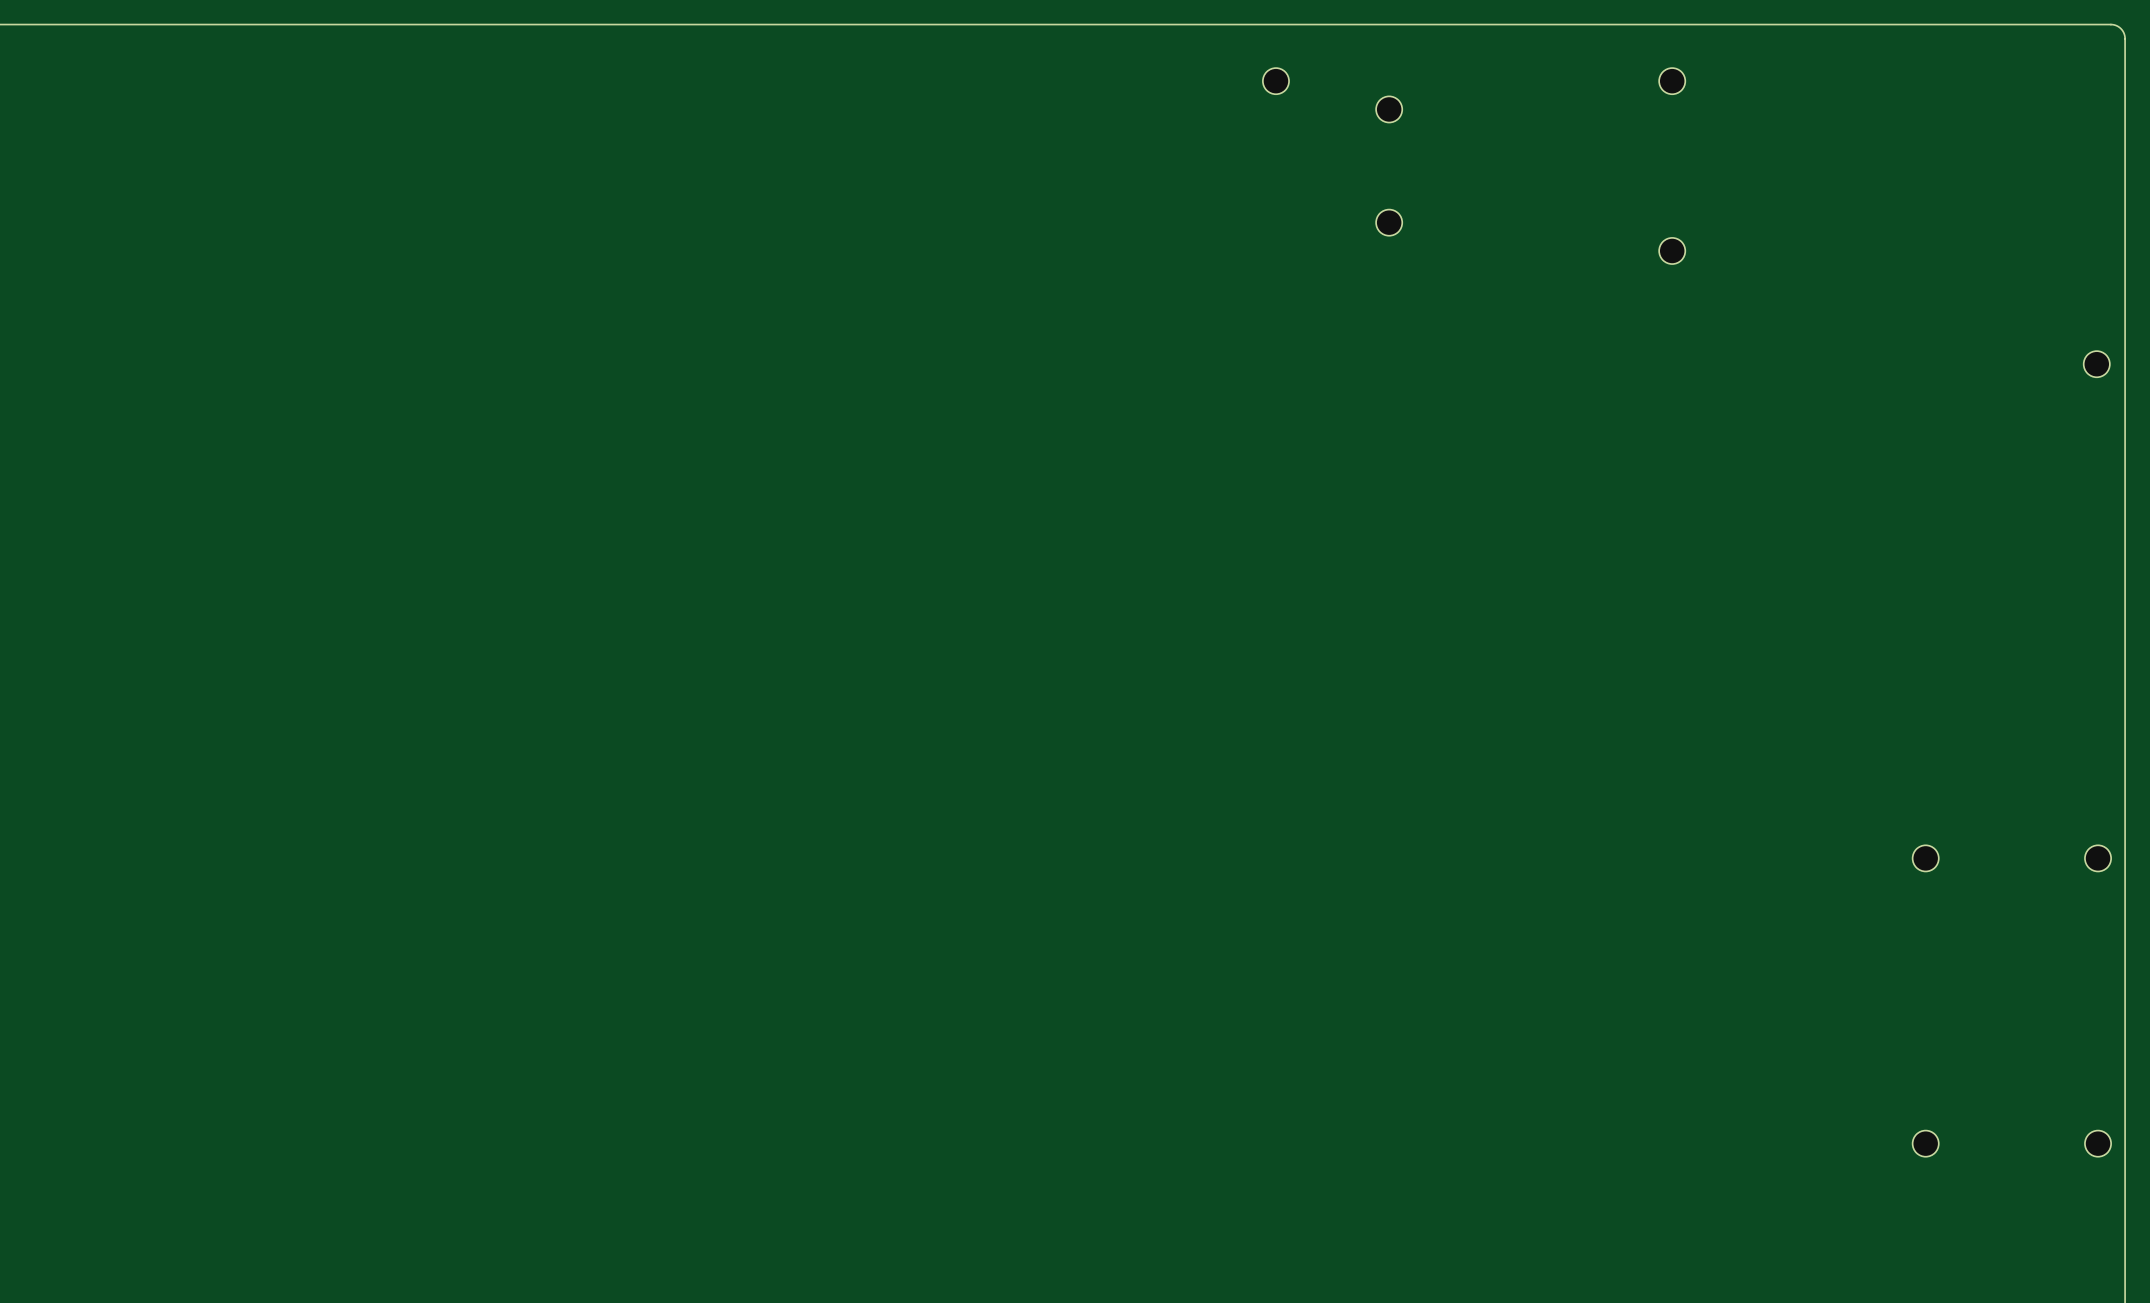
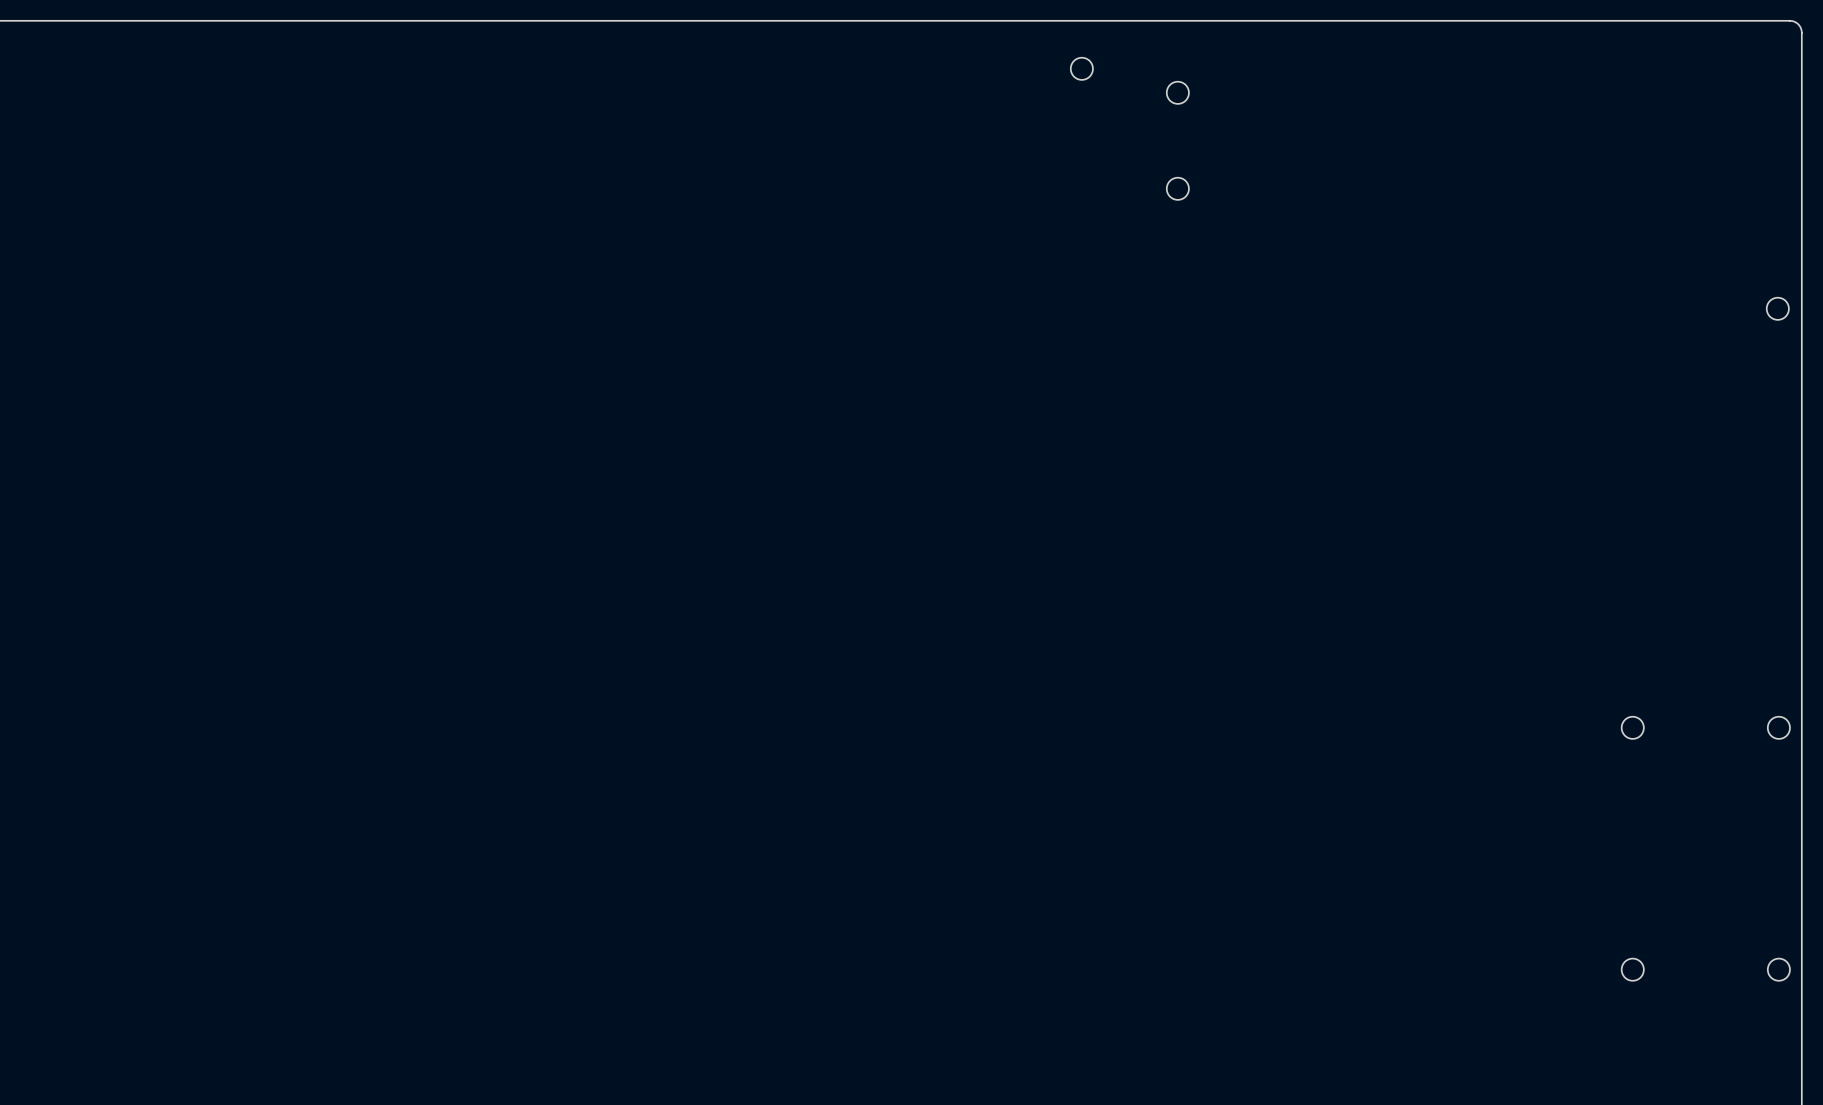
part: (1672, 81) -> none
part: (1672, 250) -> none

